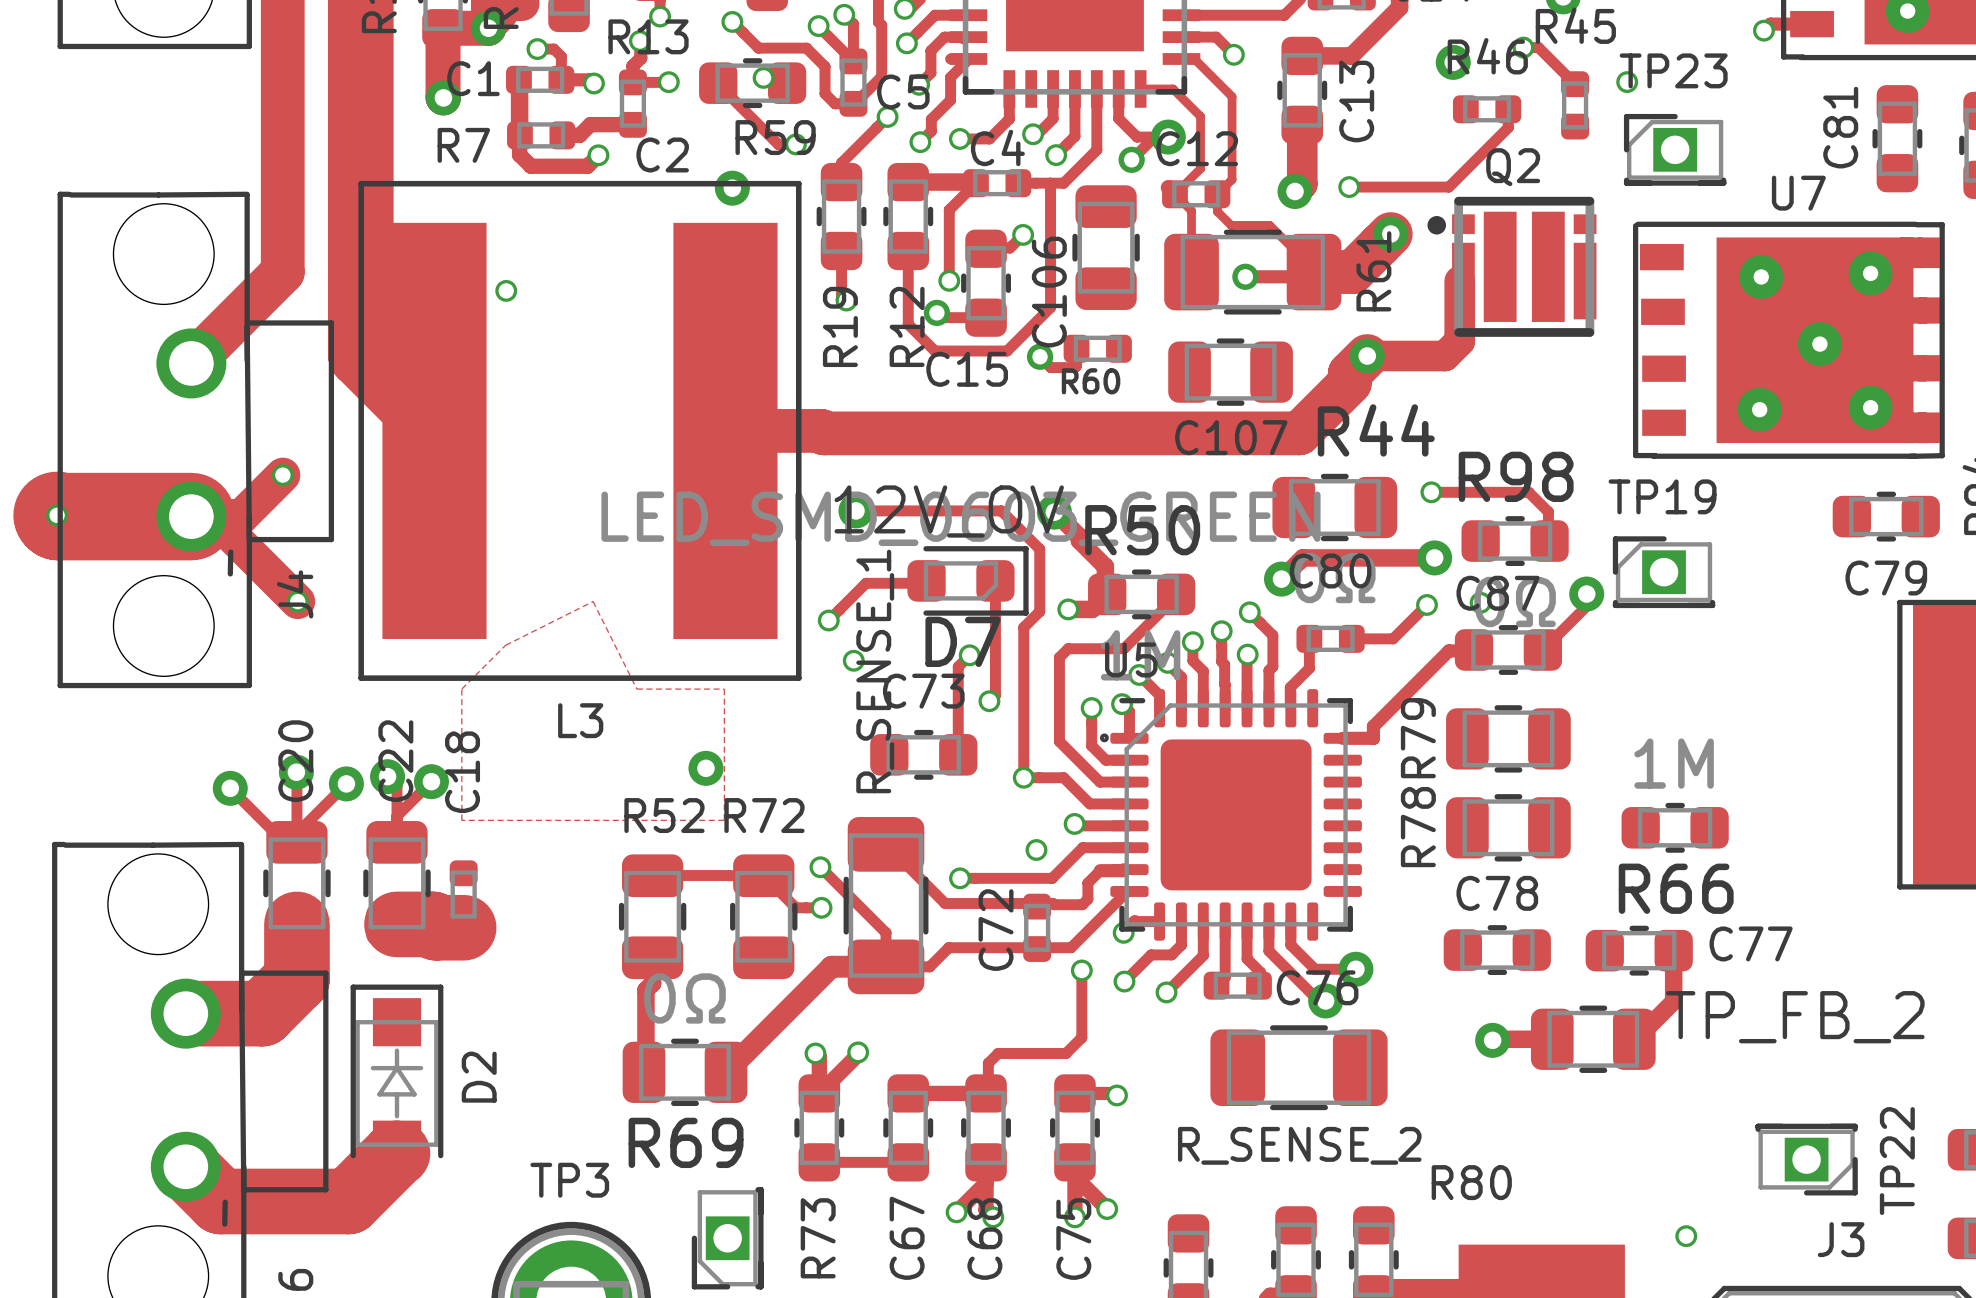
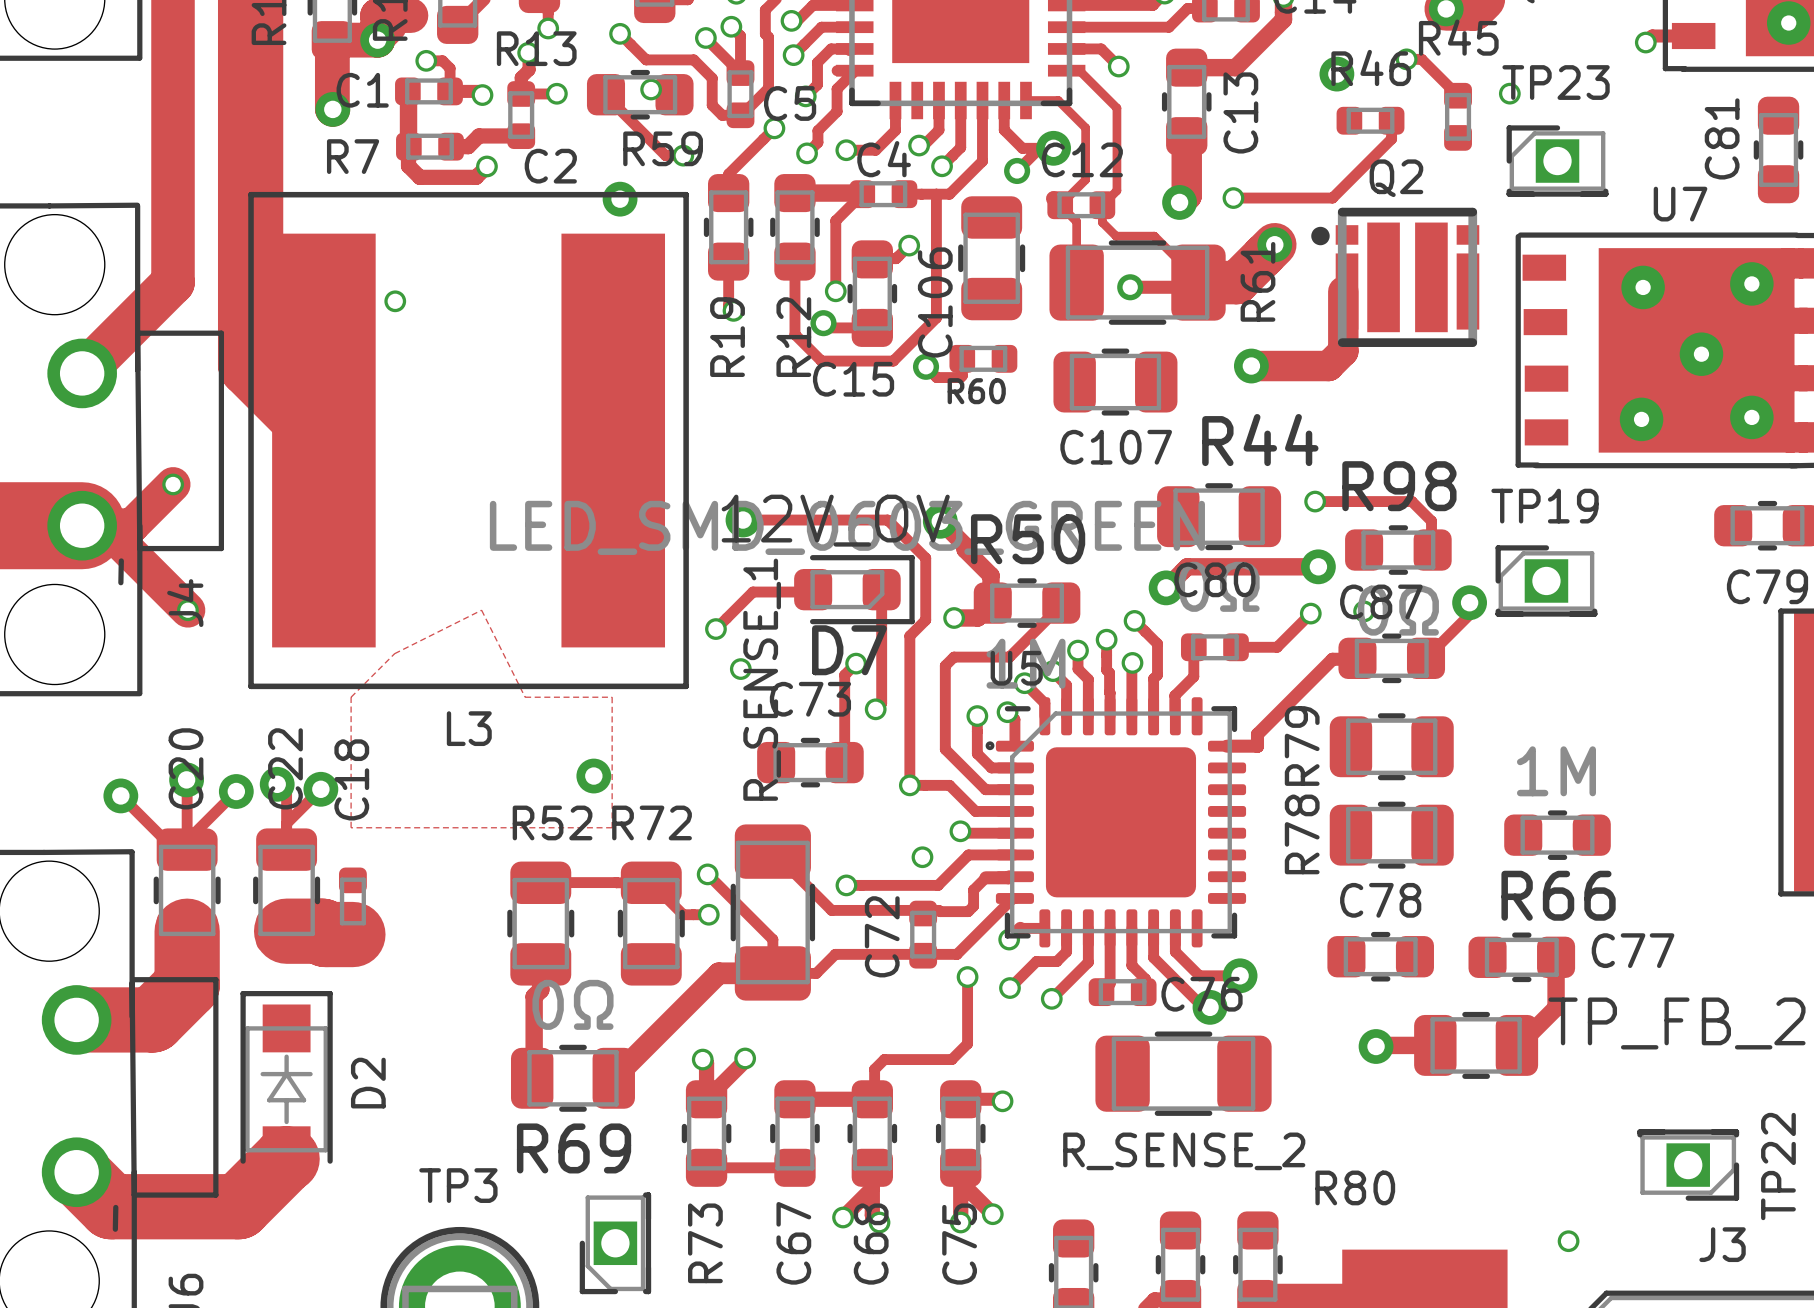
track: (1367, 356) (1349, 373) (1349, 382) (1299, 433) (823, 433) (821, 430) (725, 430) -> none

